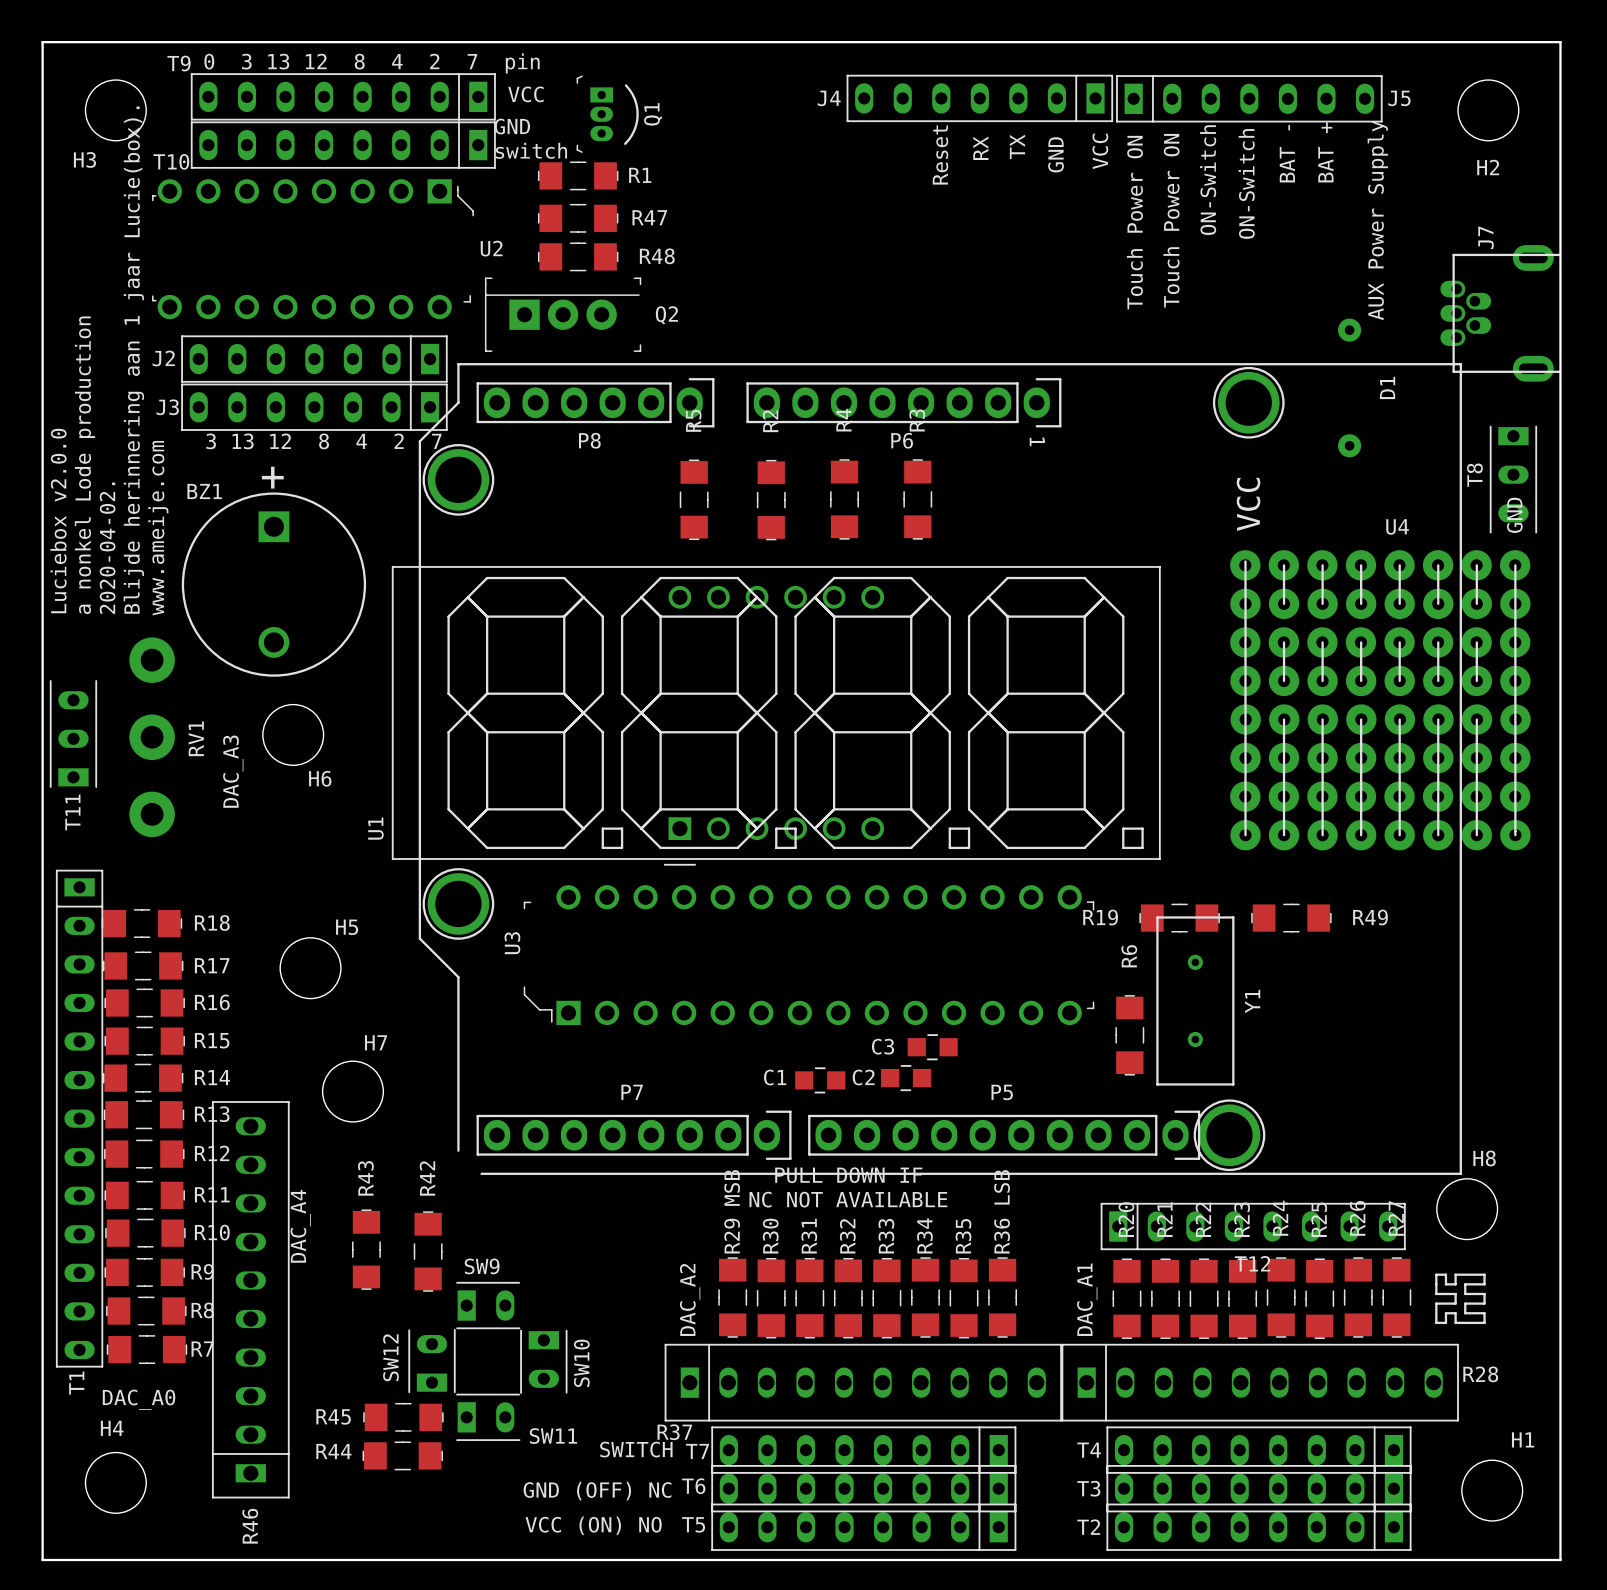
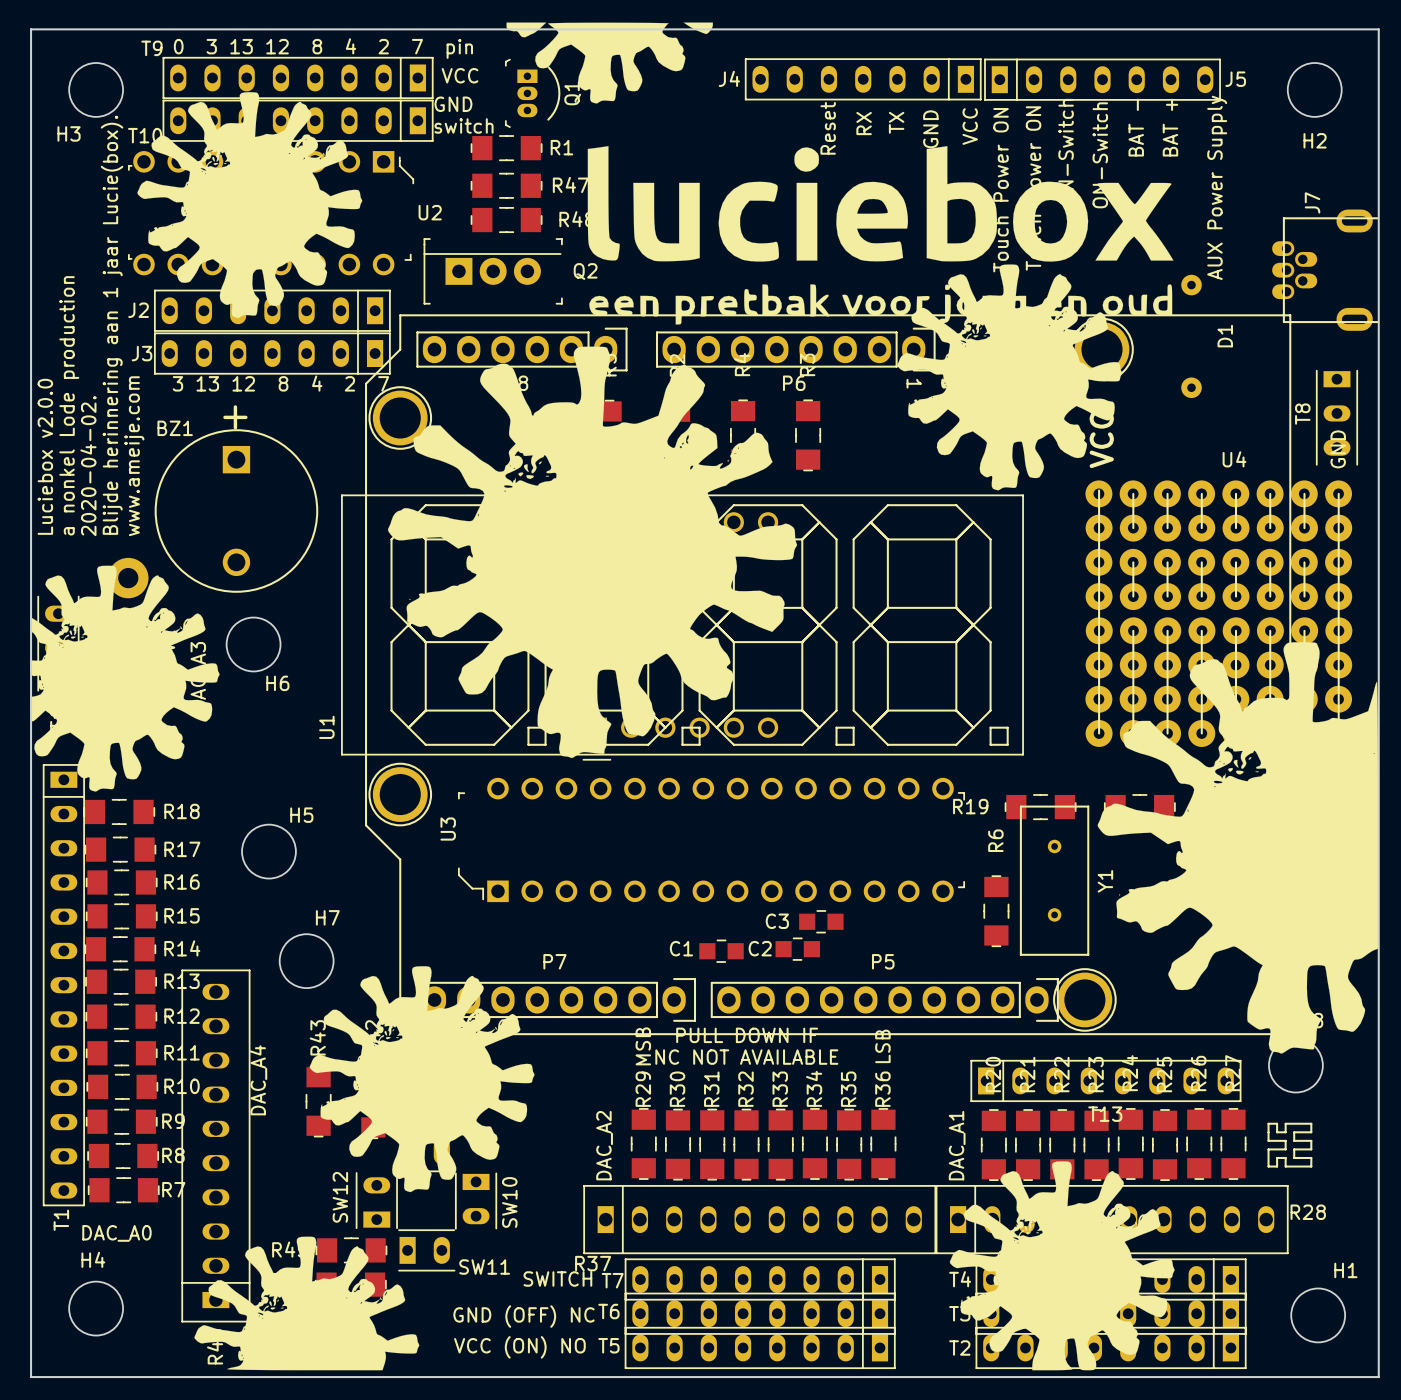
drawing: none -> [30, 22, 1379, 1371]
T12 name: T12 (1252, 1263) -> T13 (1105, 1114)

